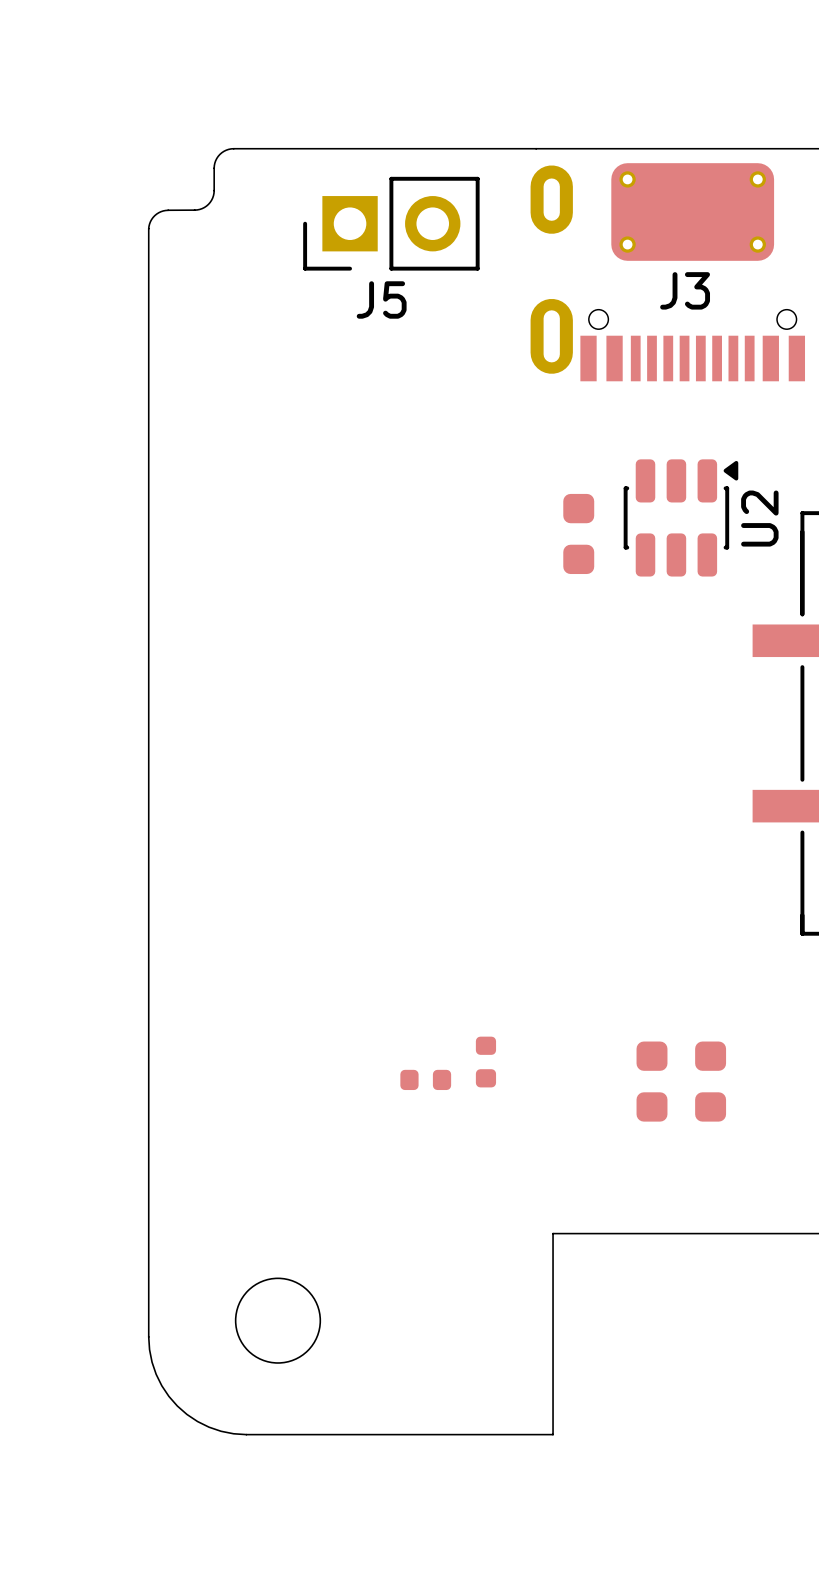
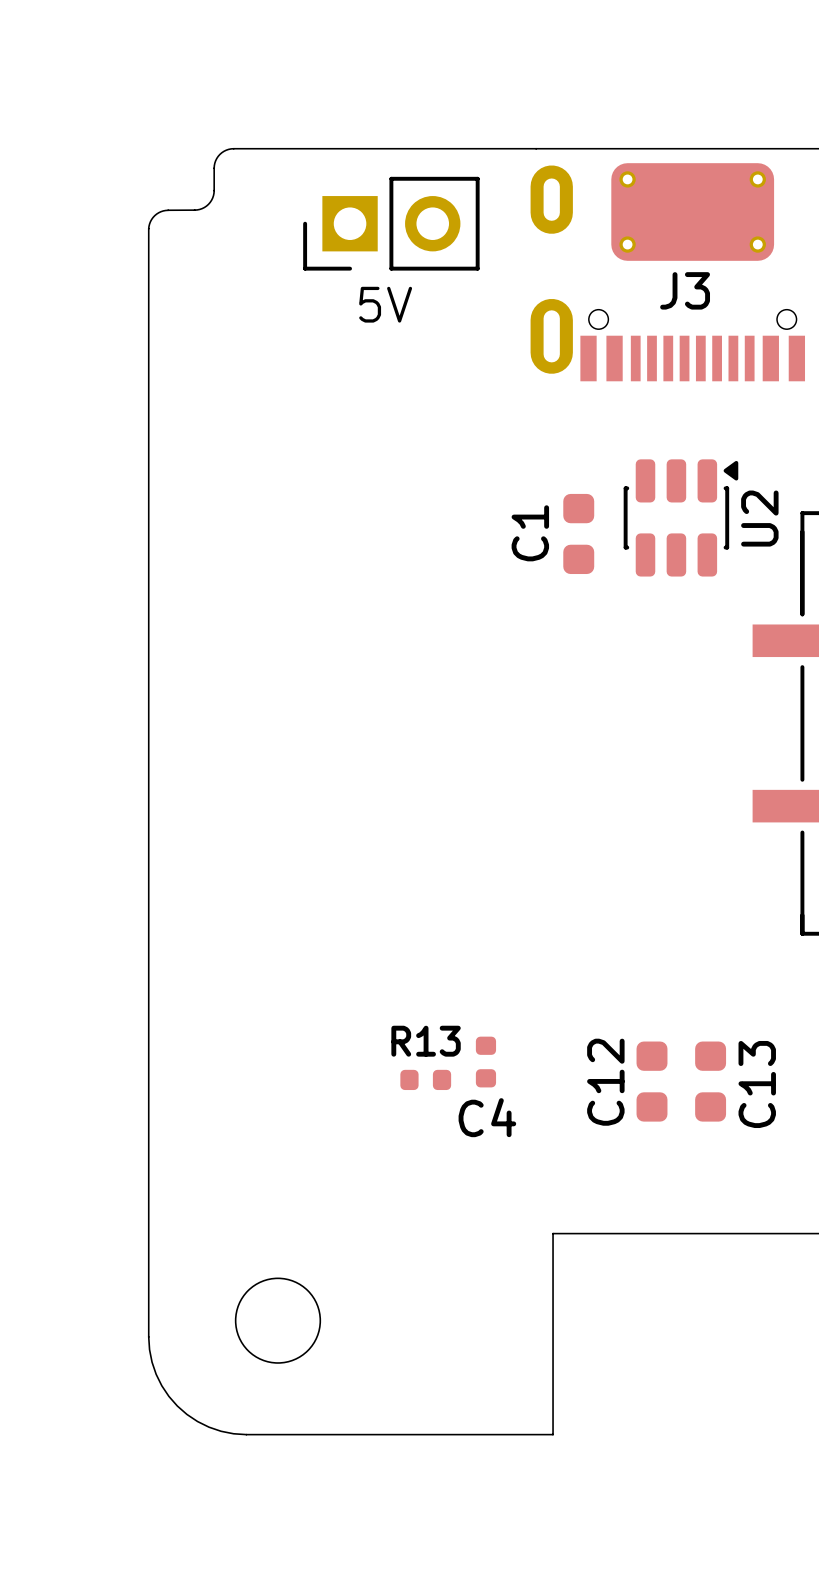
J5 name: J5 (381, 299) -> none
text: none -> 5V (385, 304)
C1 name: none -> C1 (530, 533)
R13 name: none -> R13 (426, 1041)
C12 name: none -> C12 (605, 1082)
C13 name: none -> C13 (757, 1084)
C4 name: none -> C4 (487, 1117)

